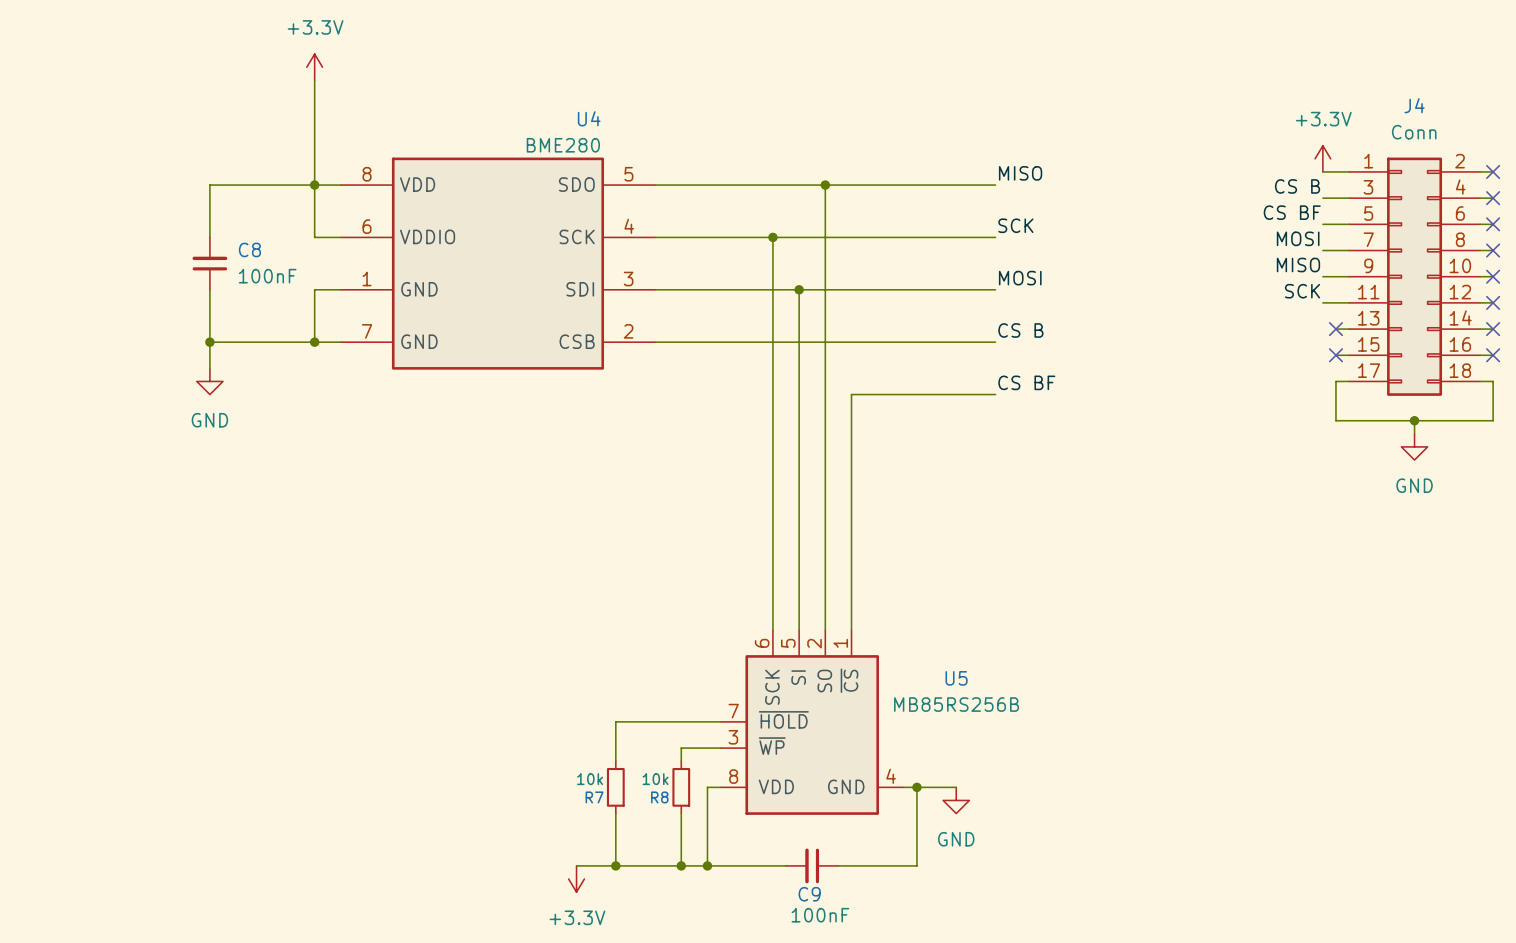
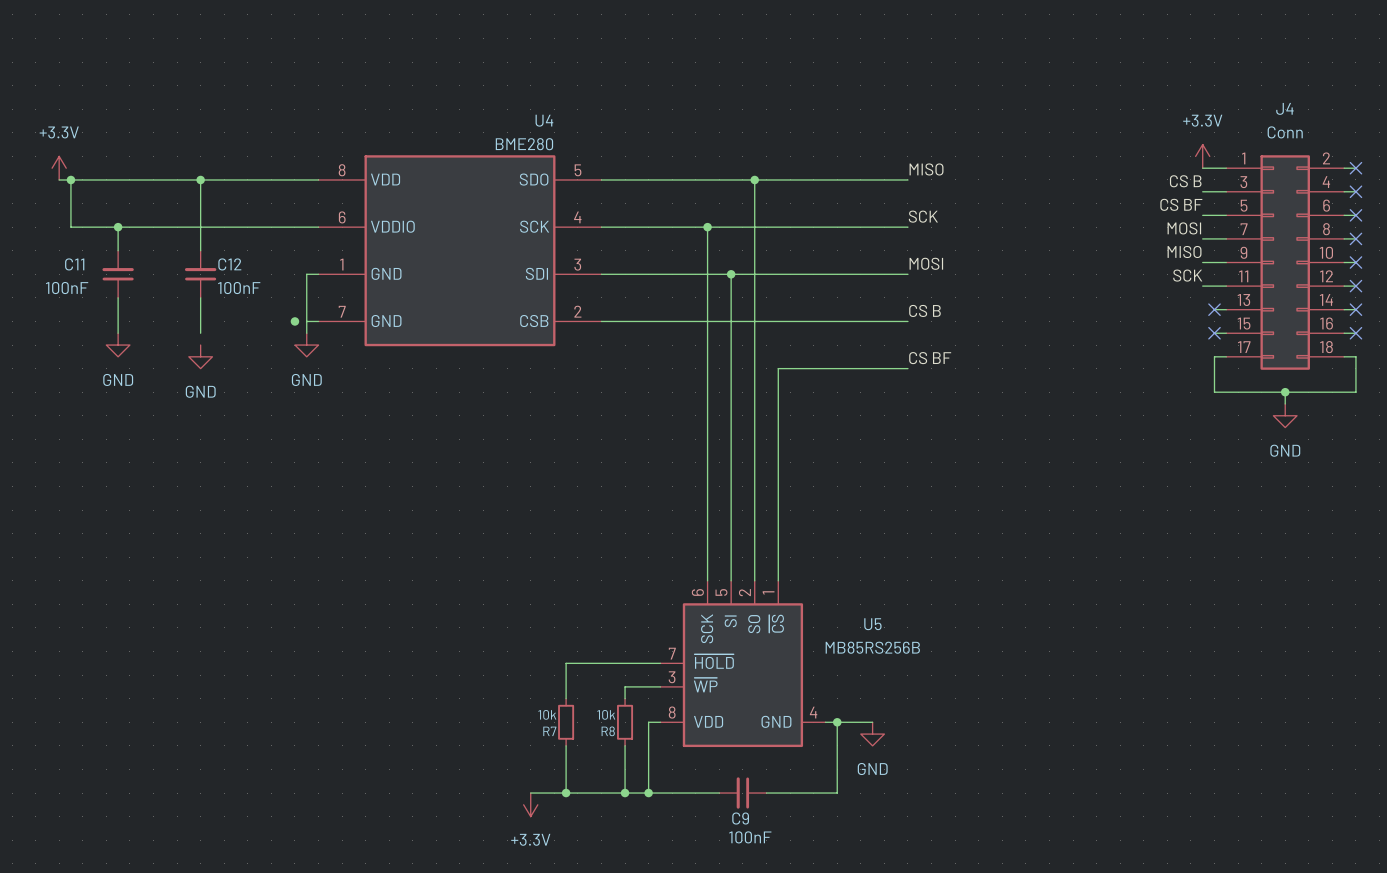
power symbol: +3.3V (314, 67) -> none
wire: (314, 80) (314, 237) -> (70, 179) (70, 227) (294, 227)
power symbol: none -> +3.3V (59, 168)
wire: none -> (59, 179) (200, 179)
junction: none -> (70, 179)
junction: none -> (200, 179)
junction: (314, 185) -> none
wire: none -> (118, 227) (118, 250)
junction: none -> (118, 227)
C8: 100nF (209, 263) -> none
C11: none -> 100nF (118, 274)
C12: none -> 100nF (200, 274)
wire: (327, 289) (314, 289) (314, 342) -> (306, 274) (306, 333)
wire: none -> (118, 297) (118, 333)
wire: (209, 342) (327, 342) -> none
junction: (209, 342) -> none
wire: (209, 355) (209, 368) -> none
power symbol: none -> GND (118, 345)
power symbol: none -> GND (306, 345)

